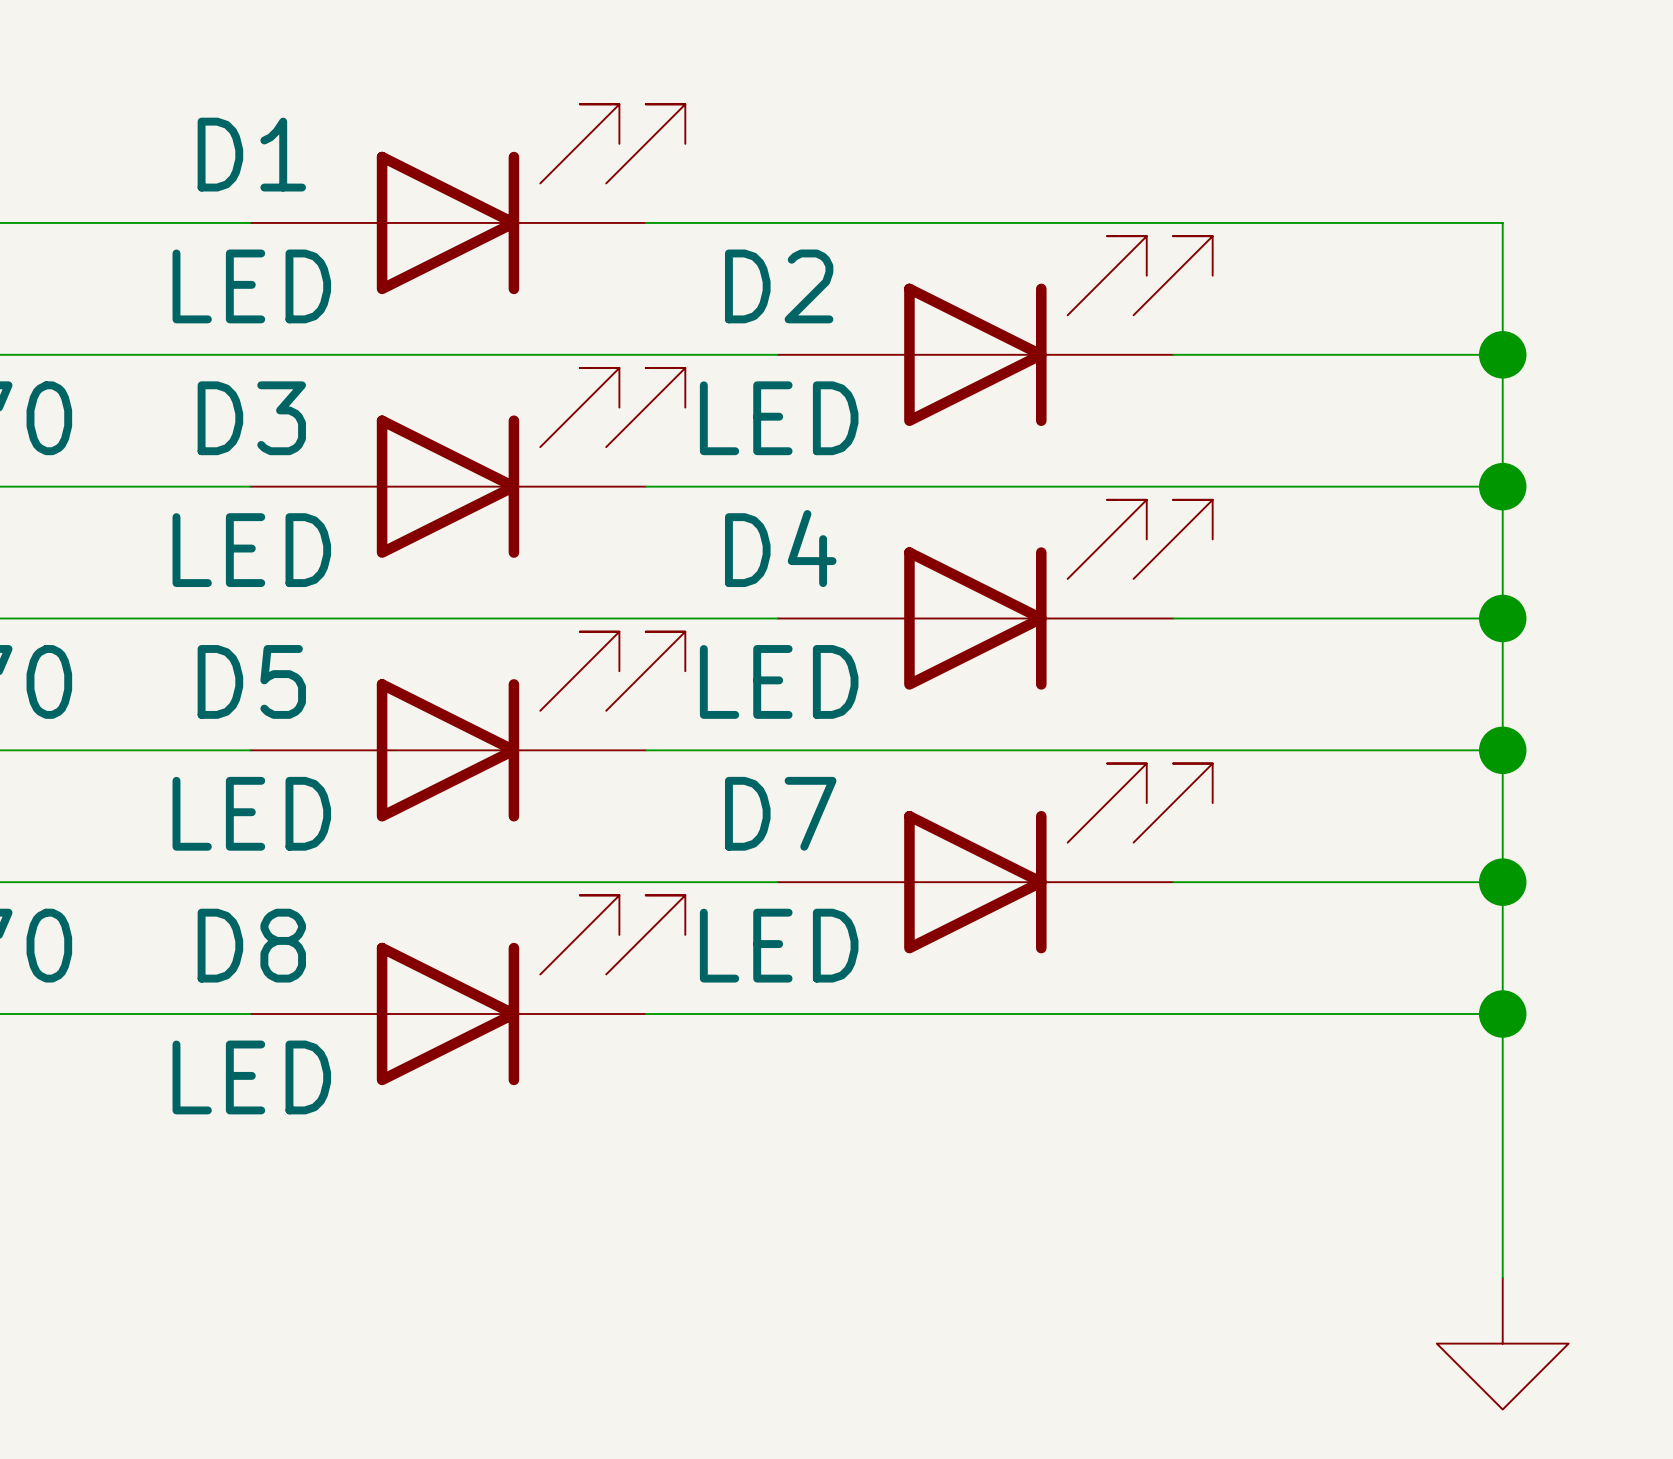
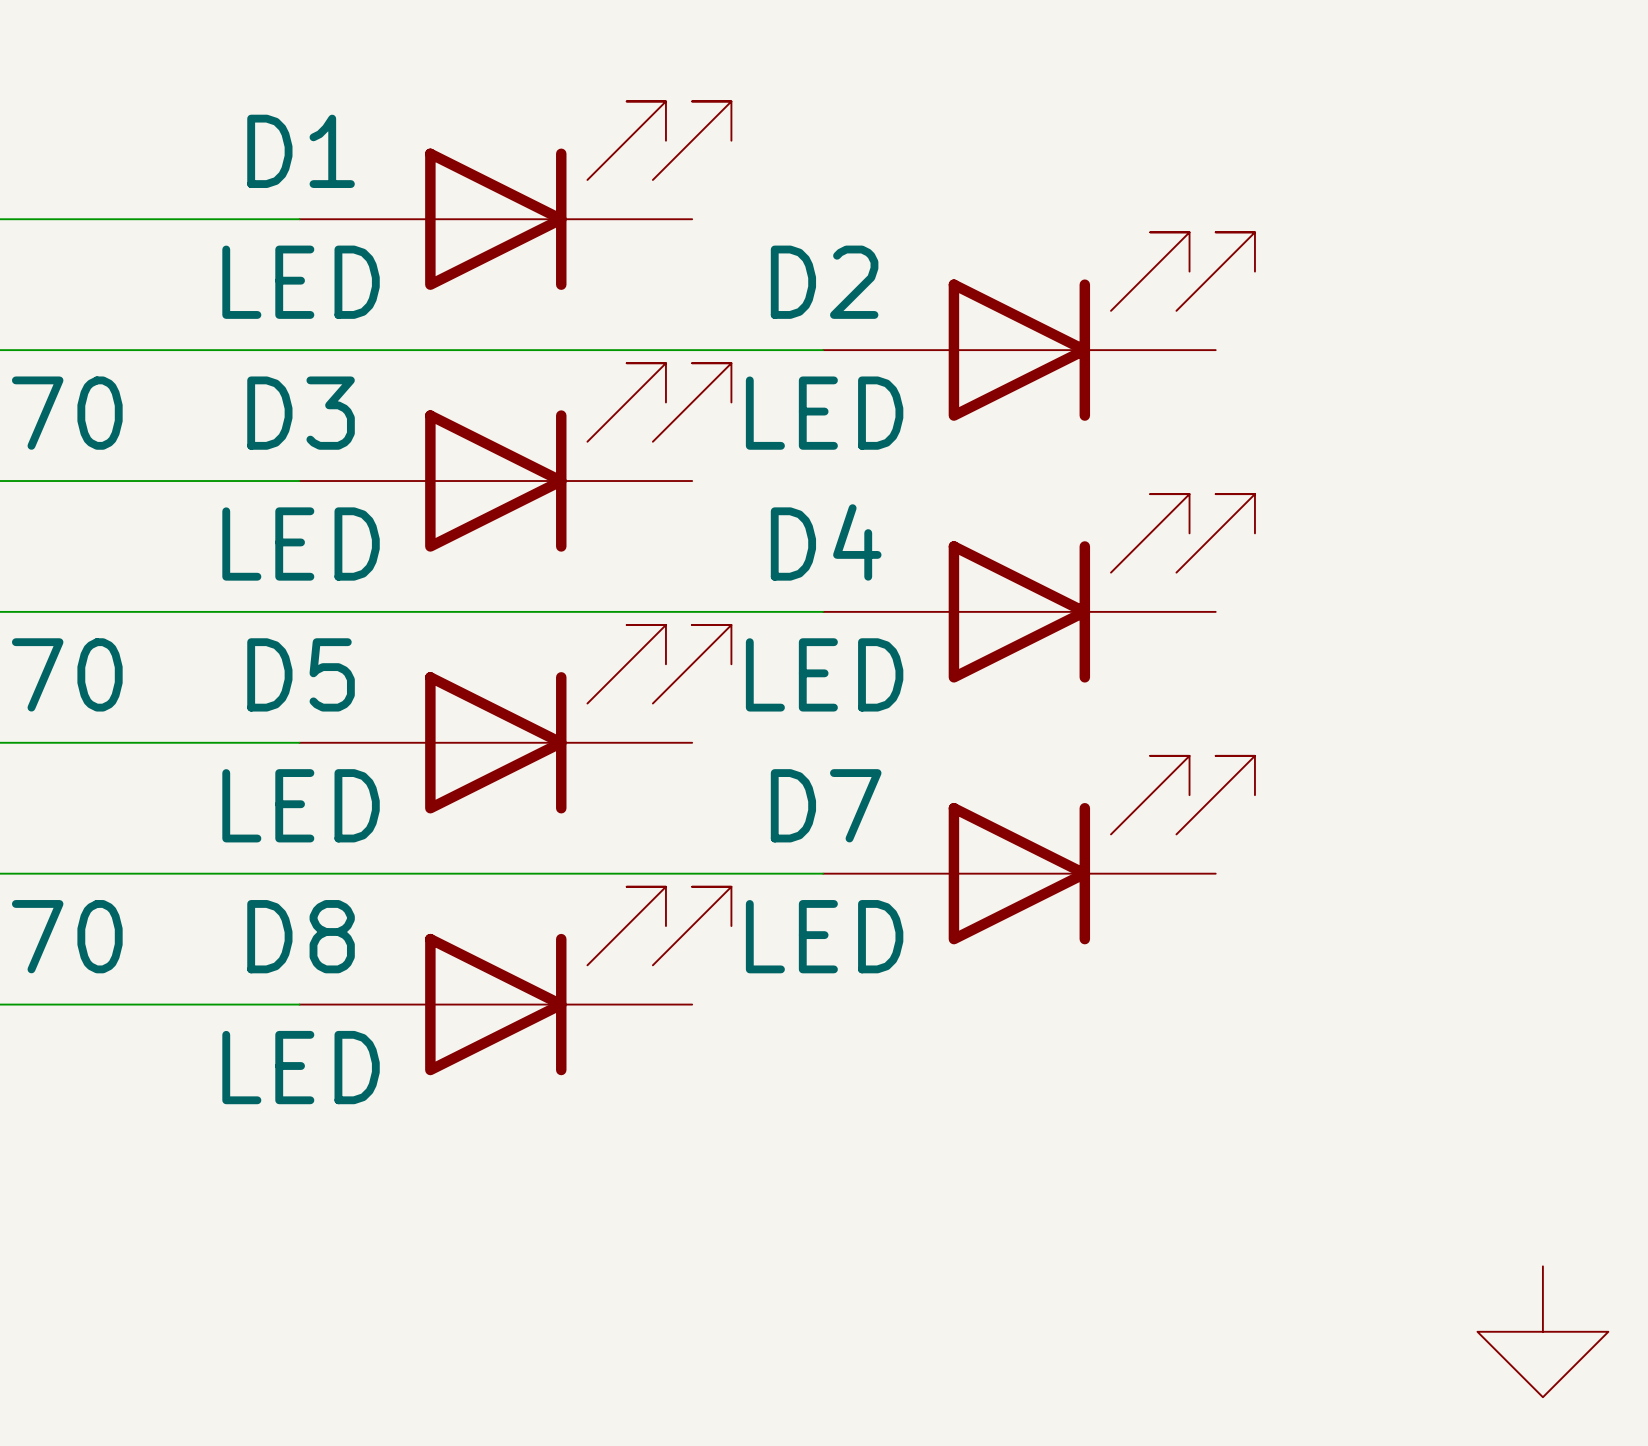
wire: (645, 222) (1502, 222) (1502, 1277) -> none
wire: (1173, 354) (1502, 354) -> none
junction: (1502, 354) -> none
wire: (645, 486) (1502, 486) -> none
junction: (1502, 486) -> none
wire: (1173, 618) (1502, 618) -> none
junction: (1502, 618) -> none
wire: (645, 750) (1502, 750) -> none
junction: (1502, 750) -> none
wire: (1173, 882) (1502, 882) -> none
junction: (1502, 882) -> none
wire: (645, 1014) (1502, 1014) -> none
junction: (1502, 1014) -> none

